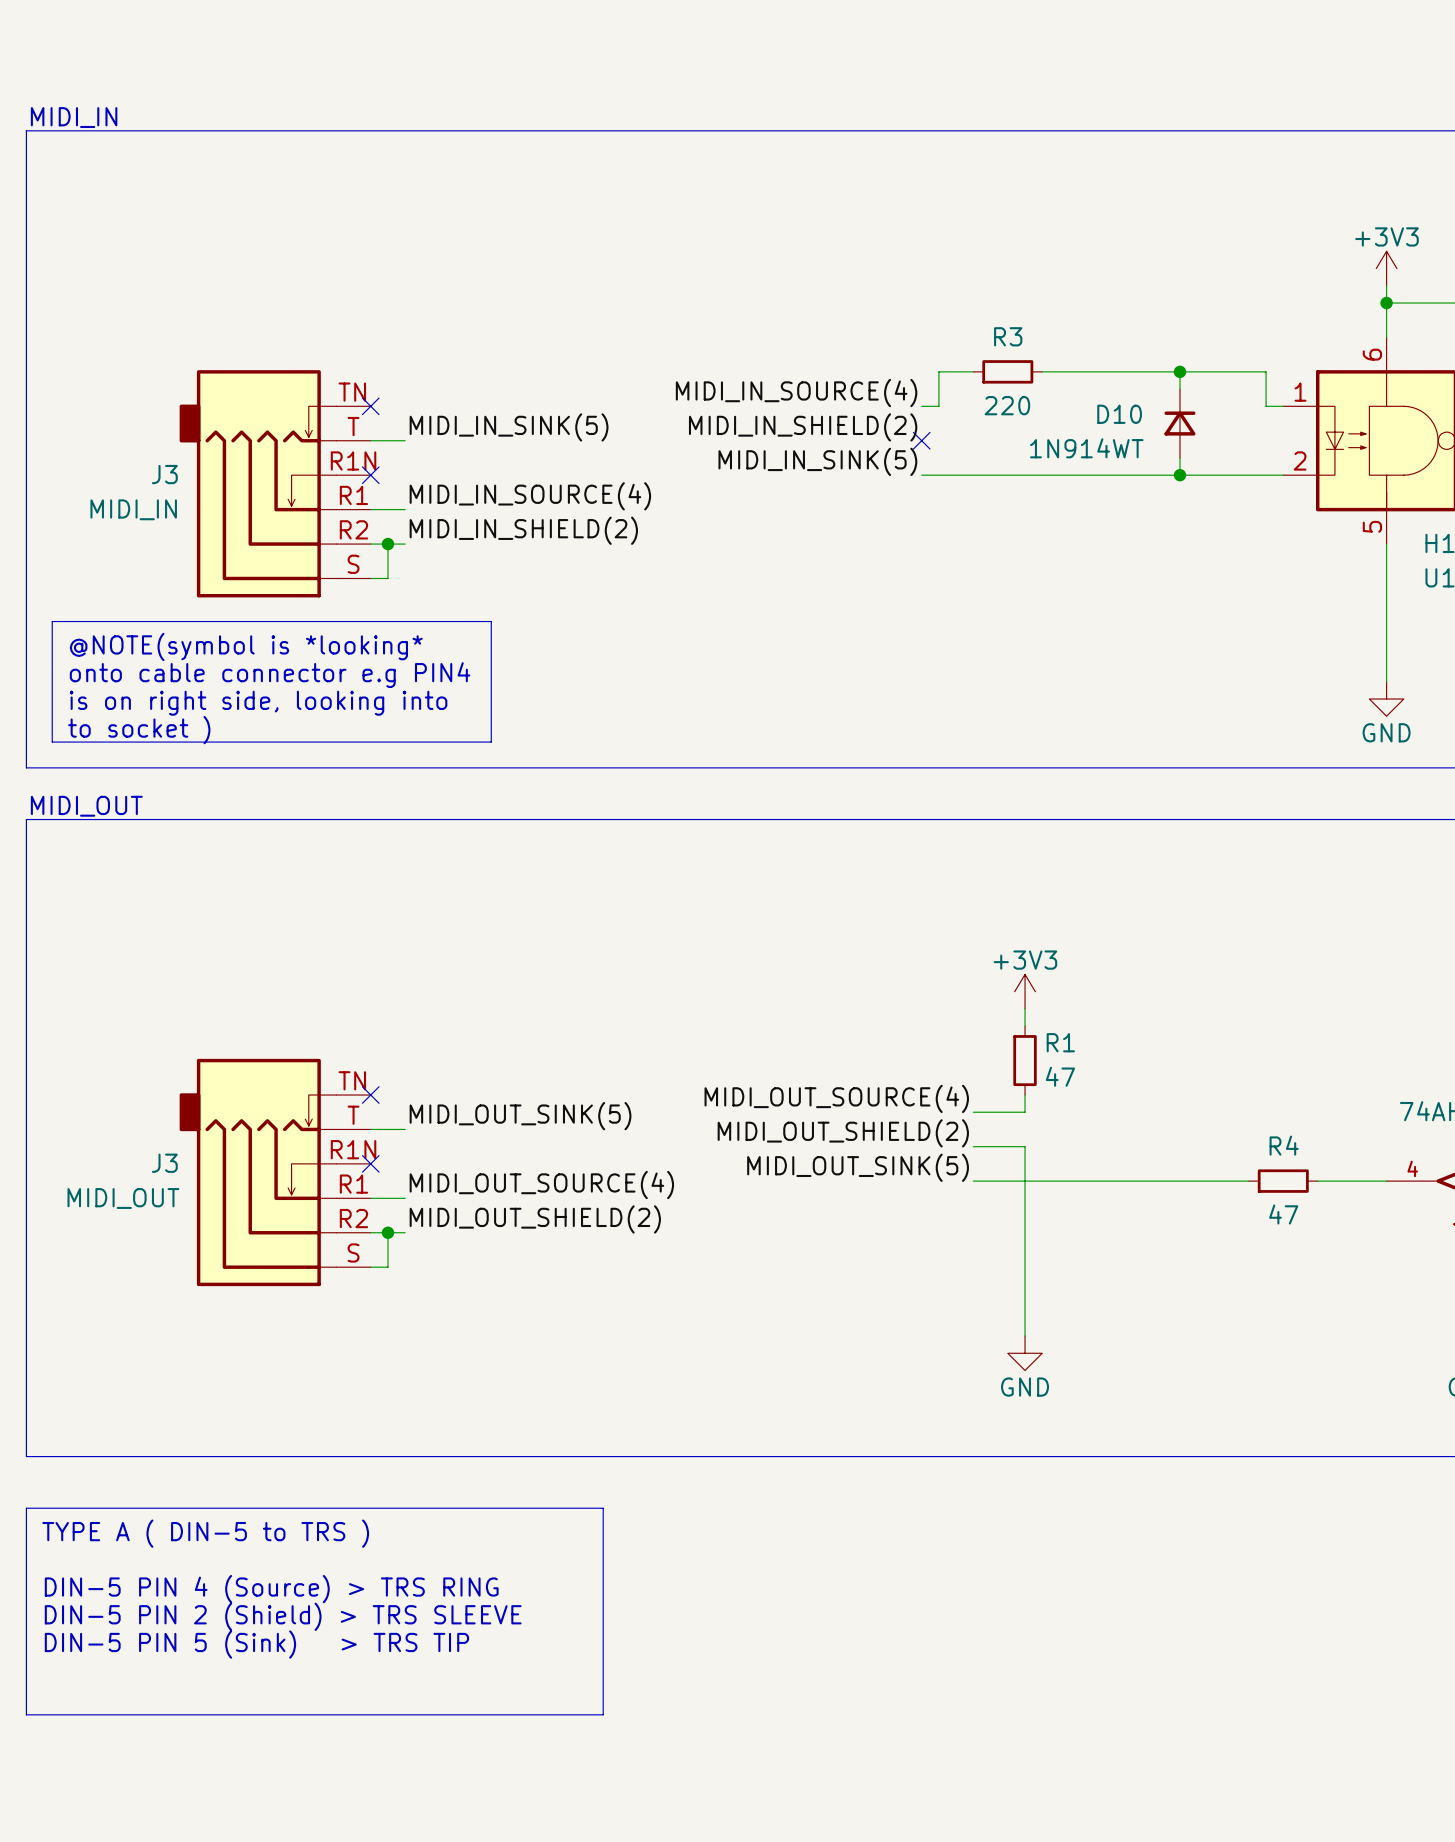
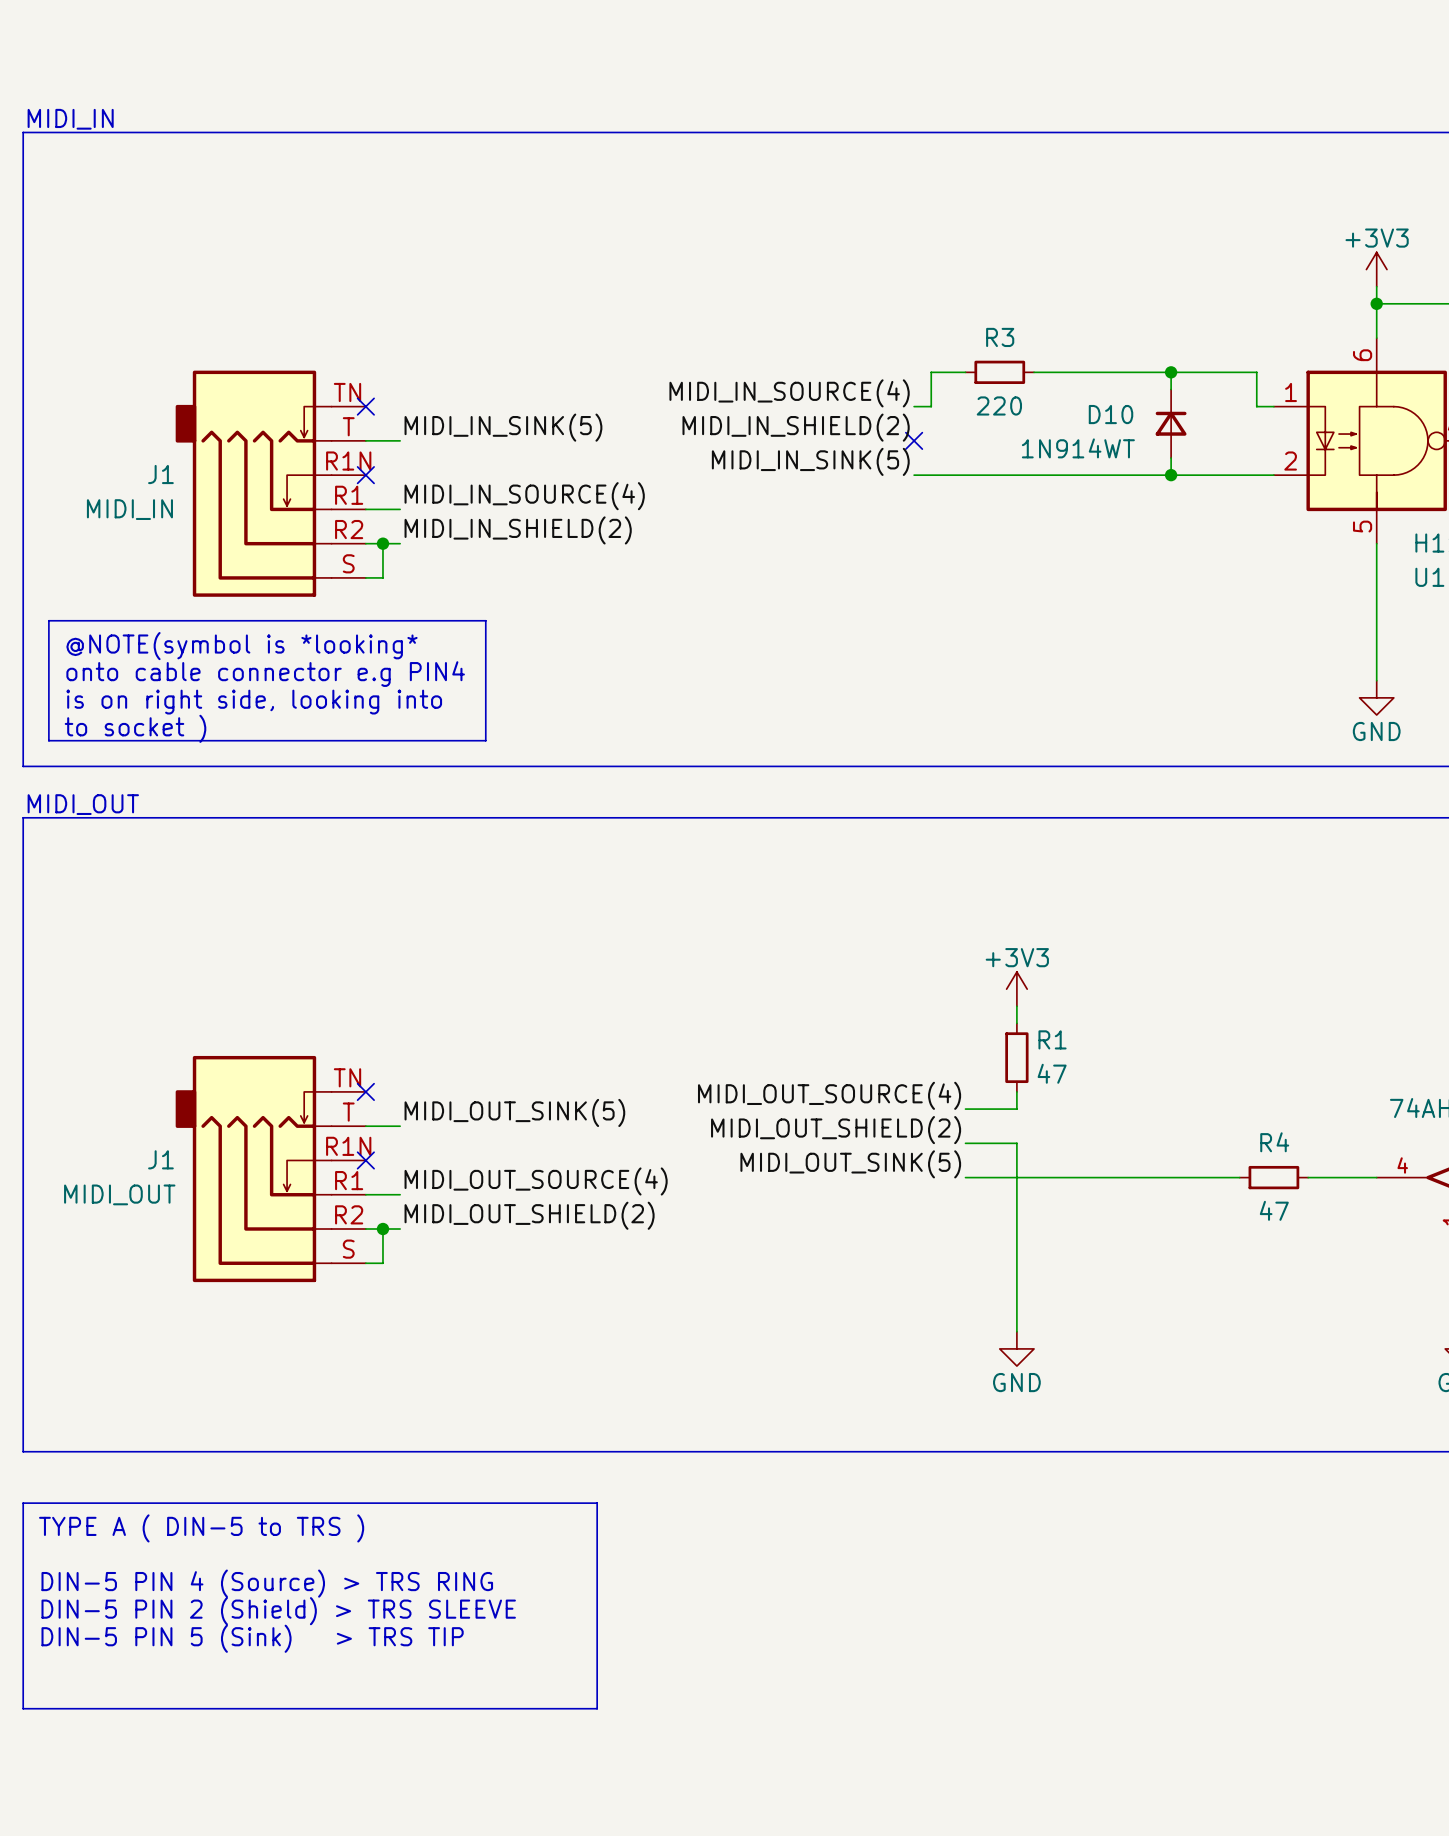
J3 name: J3 (164, 474) -> J1 (160, 474)
J3 name: J3 (164, 1163) -> J1 (160, 1159)

